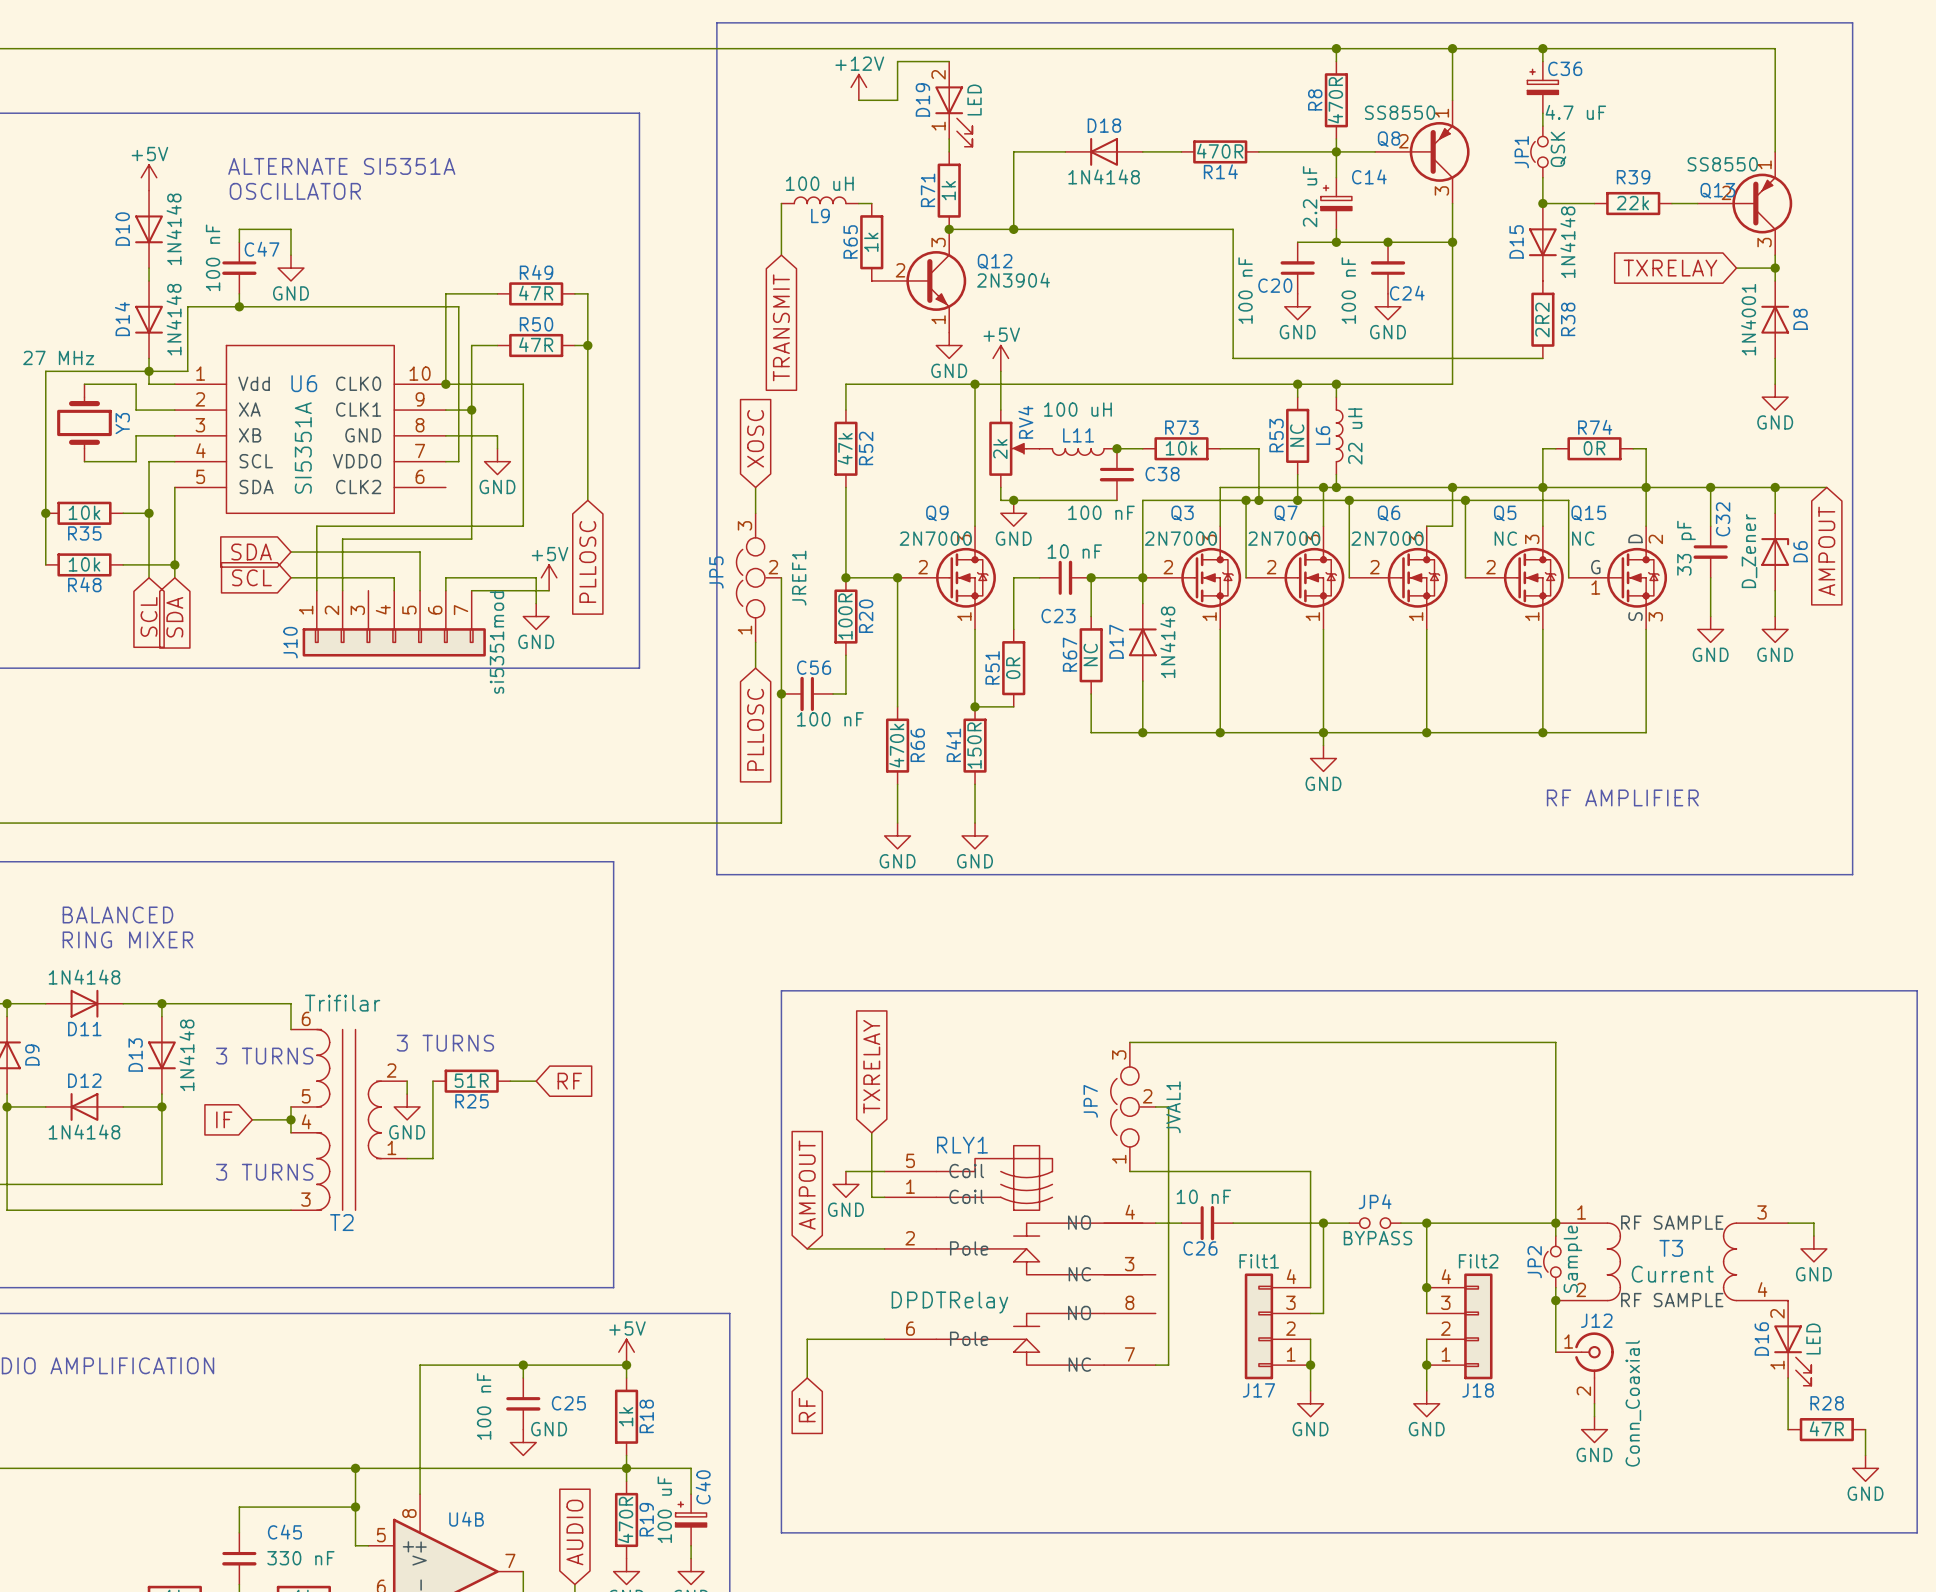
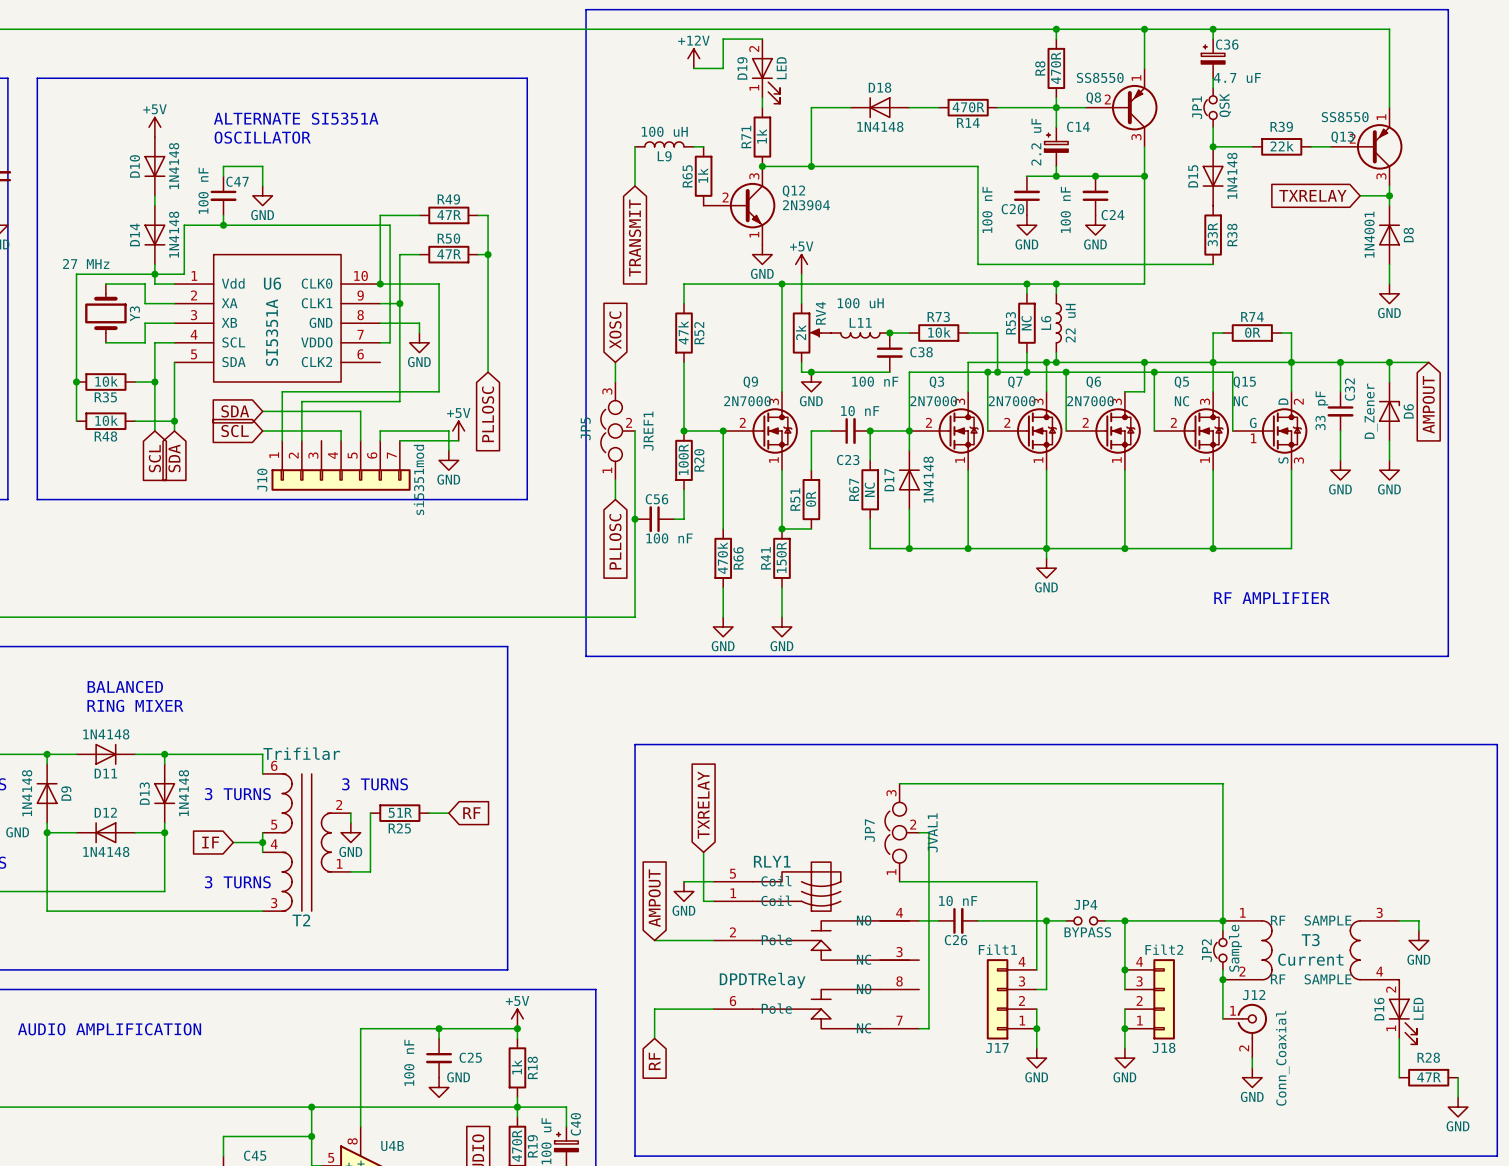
R38 value: 2R2 (1542, 320) -> 33R (1212, 234)

